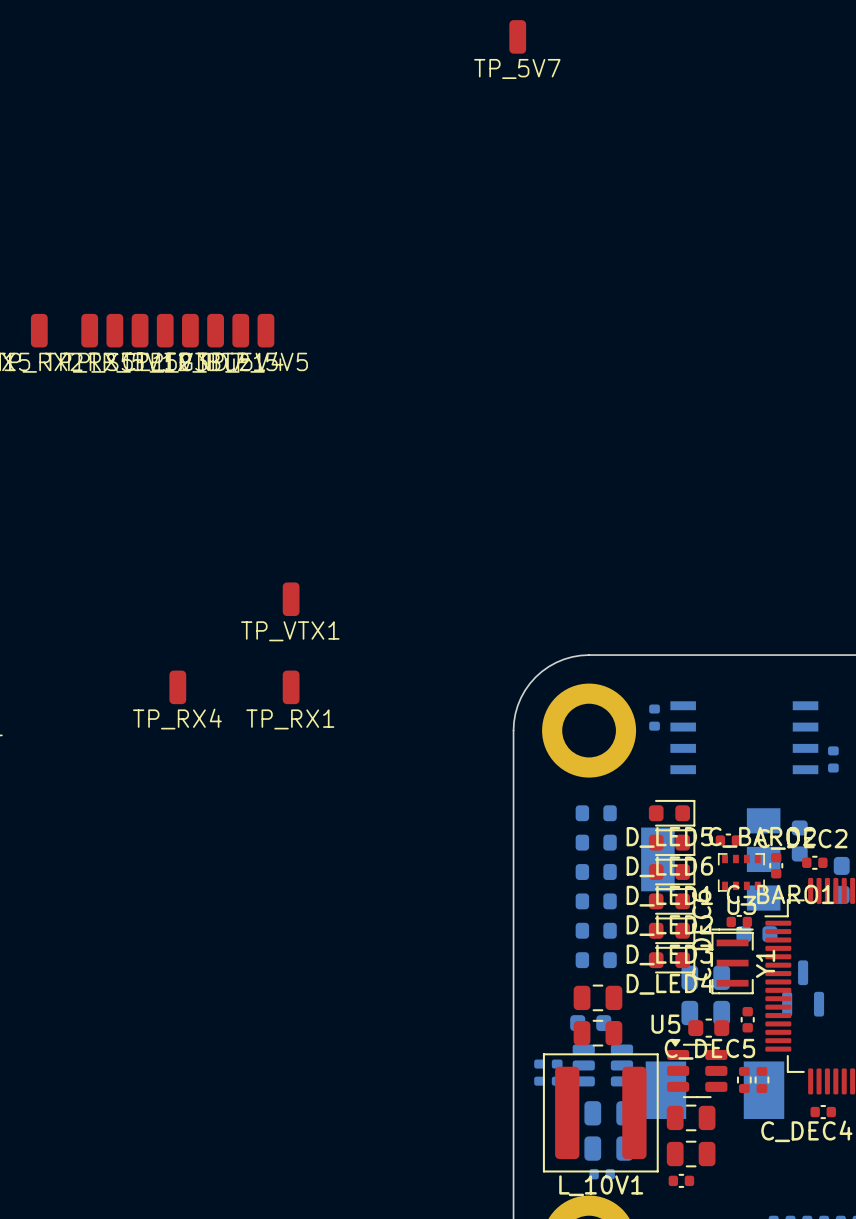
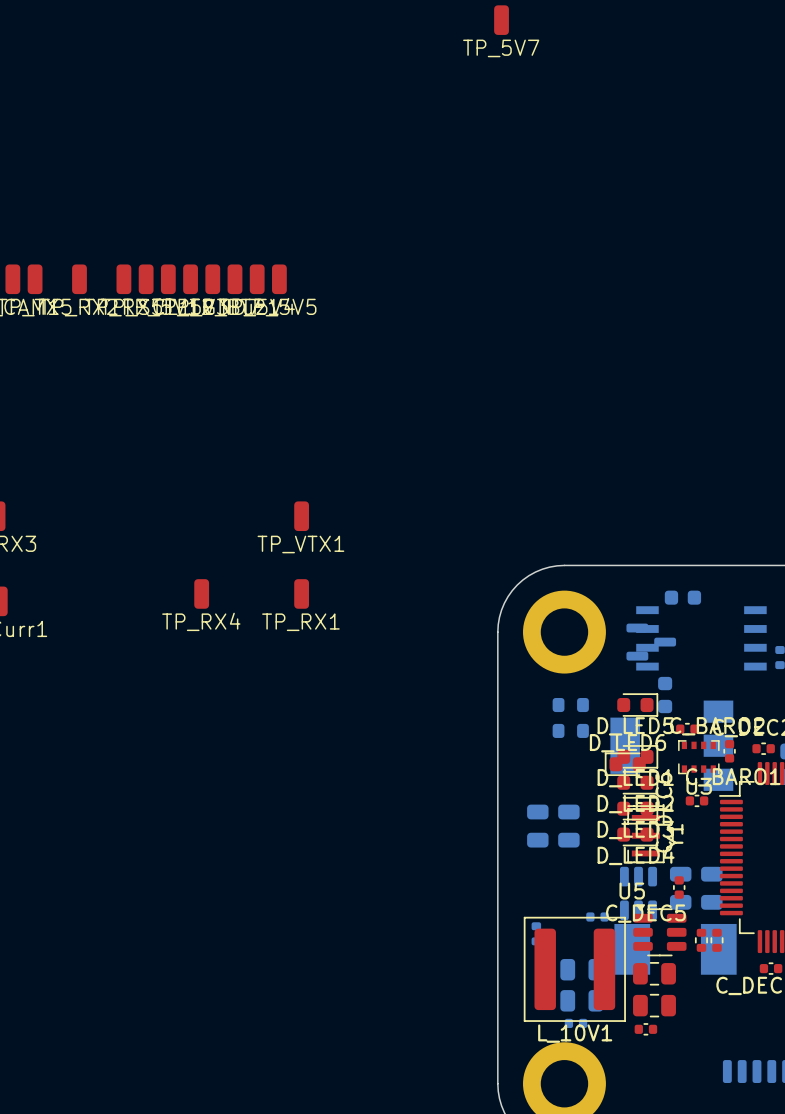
part: none -> (682, 597)
part: (654, 717) -> none
part: none -> (665, 695)
part: (799, 840) -> none
D_LED6 rotation: 0° (672, 842) -> 180° (625, 764)
D_LED6 position: (672, 842) -> (625, 764)
part: (596, 872) -> none
part: (596, 901) -> none
part: (596, 930) -> none
part: (756, 934) -> none
part: none -> (537, 826)
part: none -> (568, 826)
part: (596, 960) -> none
Y1 position: (729, 961) -> (642, 834)
part: (705, 977) -> none
part rotation: 0° (803, 988) -> 90° clockwise (651, 642)
part position: (803, 988) -> (651, 642)
part: (597, 997) -> none
part rotation: 0° (705, 1013) -> 90° clockwise (680, 888)
C_DEC5 position: (747, 1019) -> (679, 887)
part: none -> (711, 888)
part: (590, 1023) -> none
part: (708, 1028) -> none
part: (597, 1033) -> none
part: none -> (597, 916)
part rotation: 0° (602, 1065) -> 90° clockwise (638, 893)
part position: (602, 1065) -> (638, 893)
part: (539, 1072) -> none

